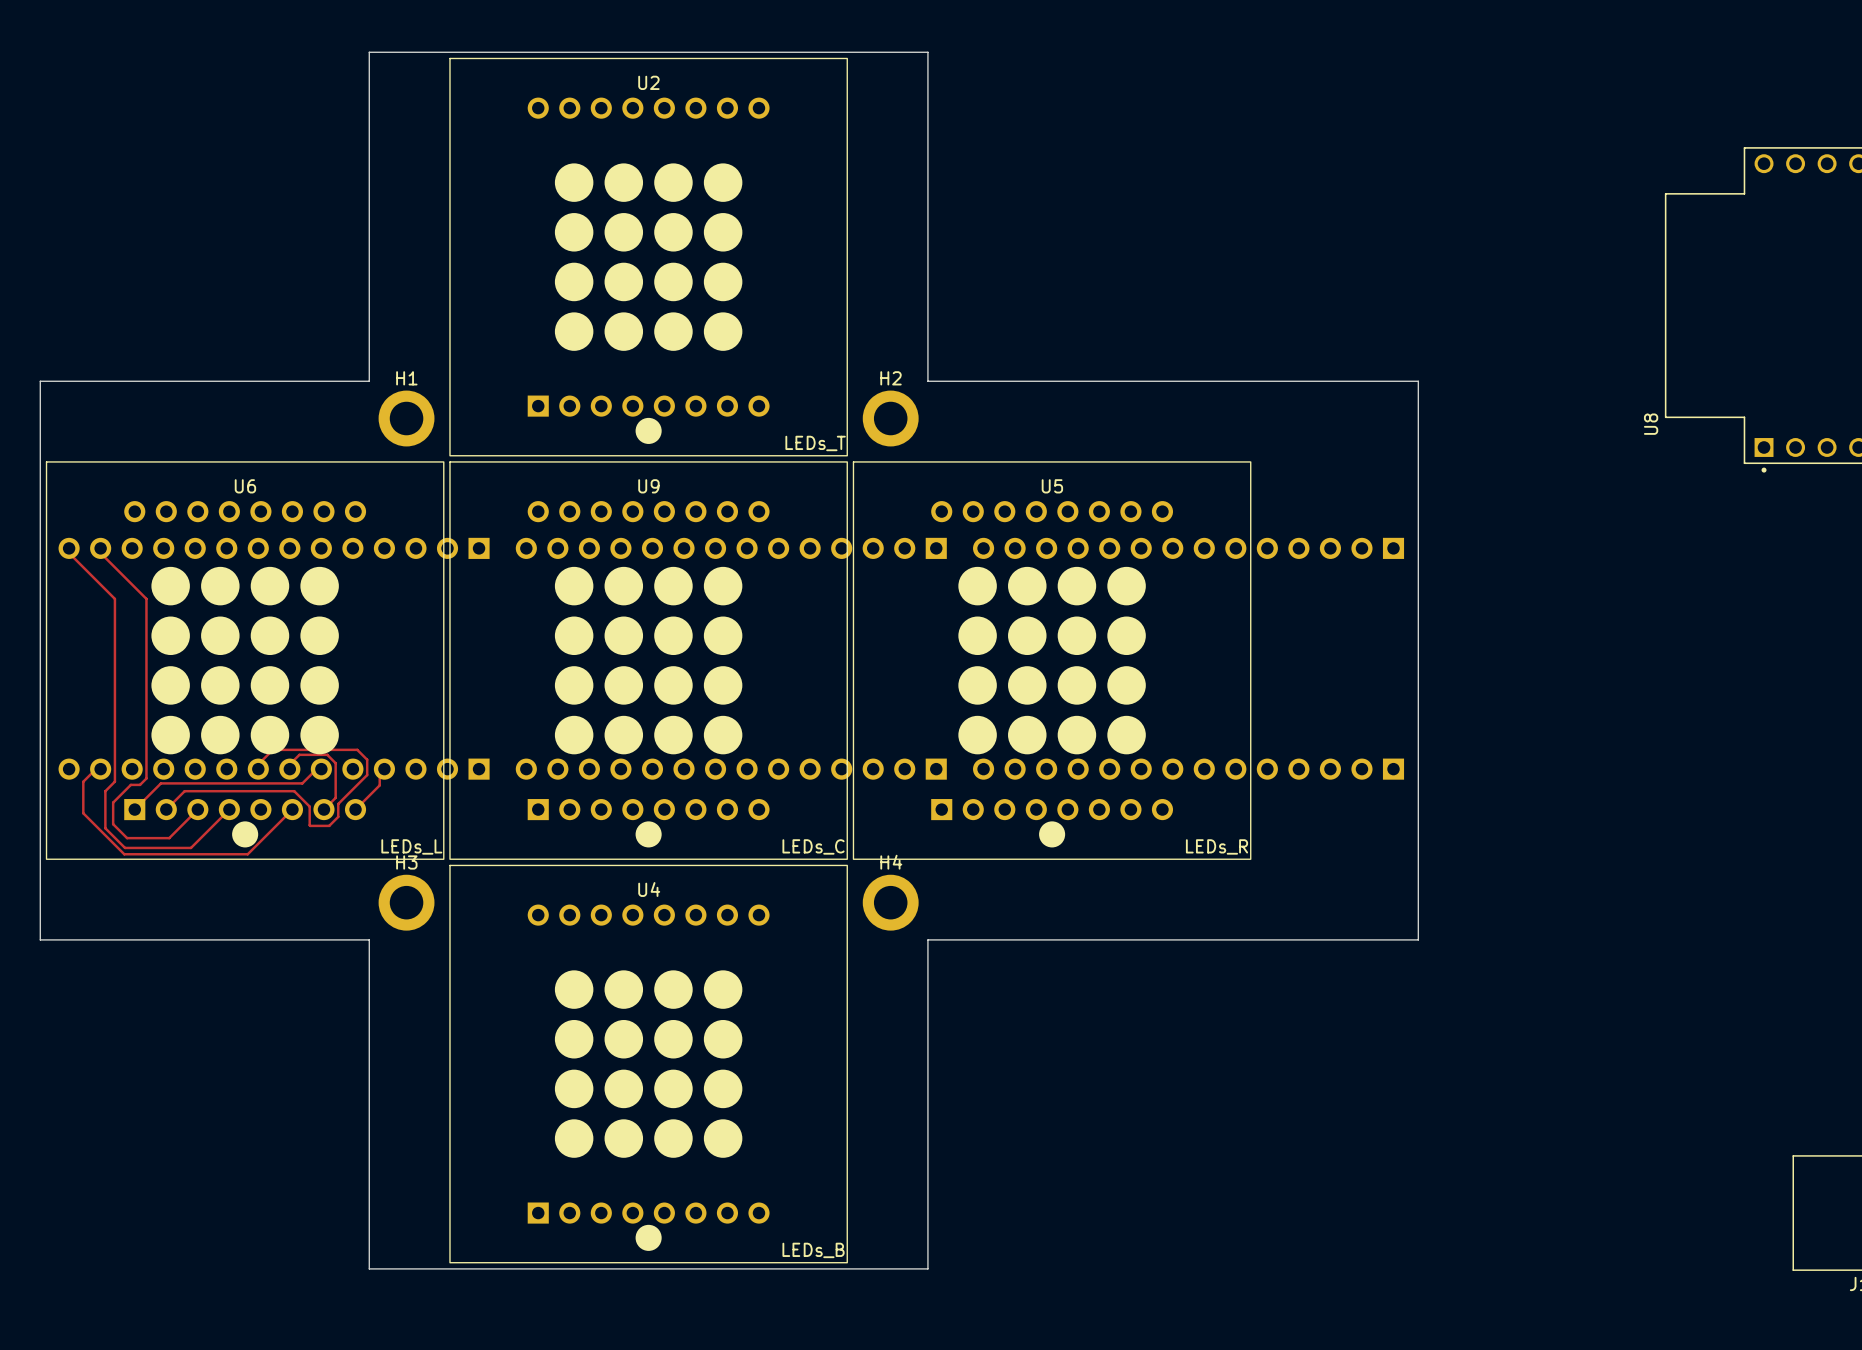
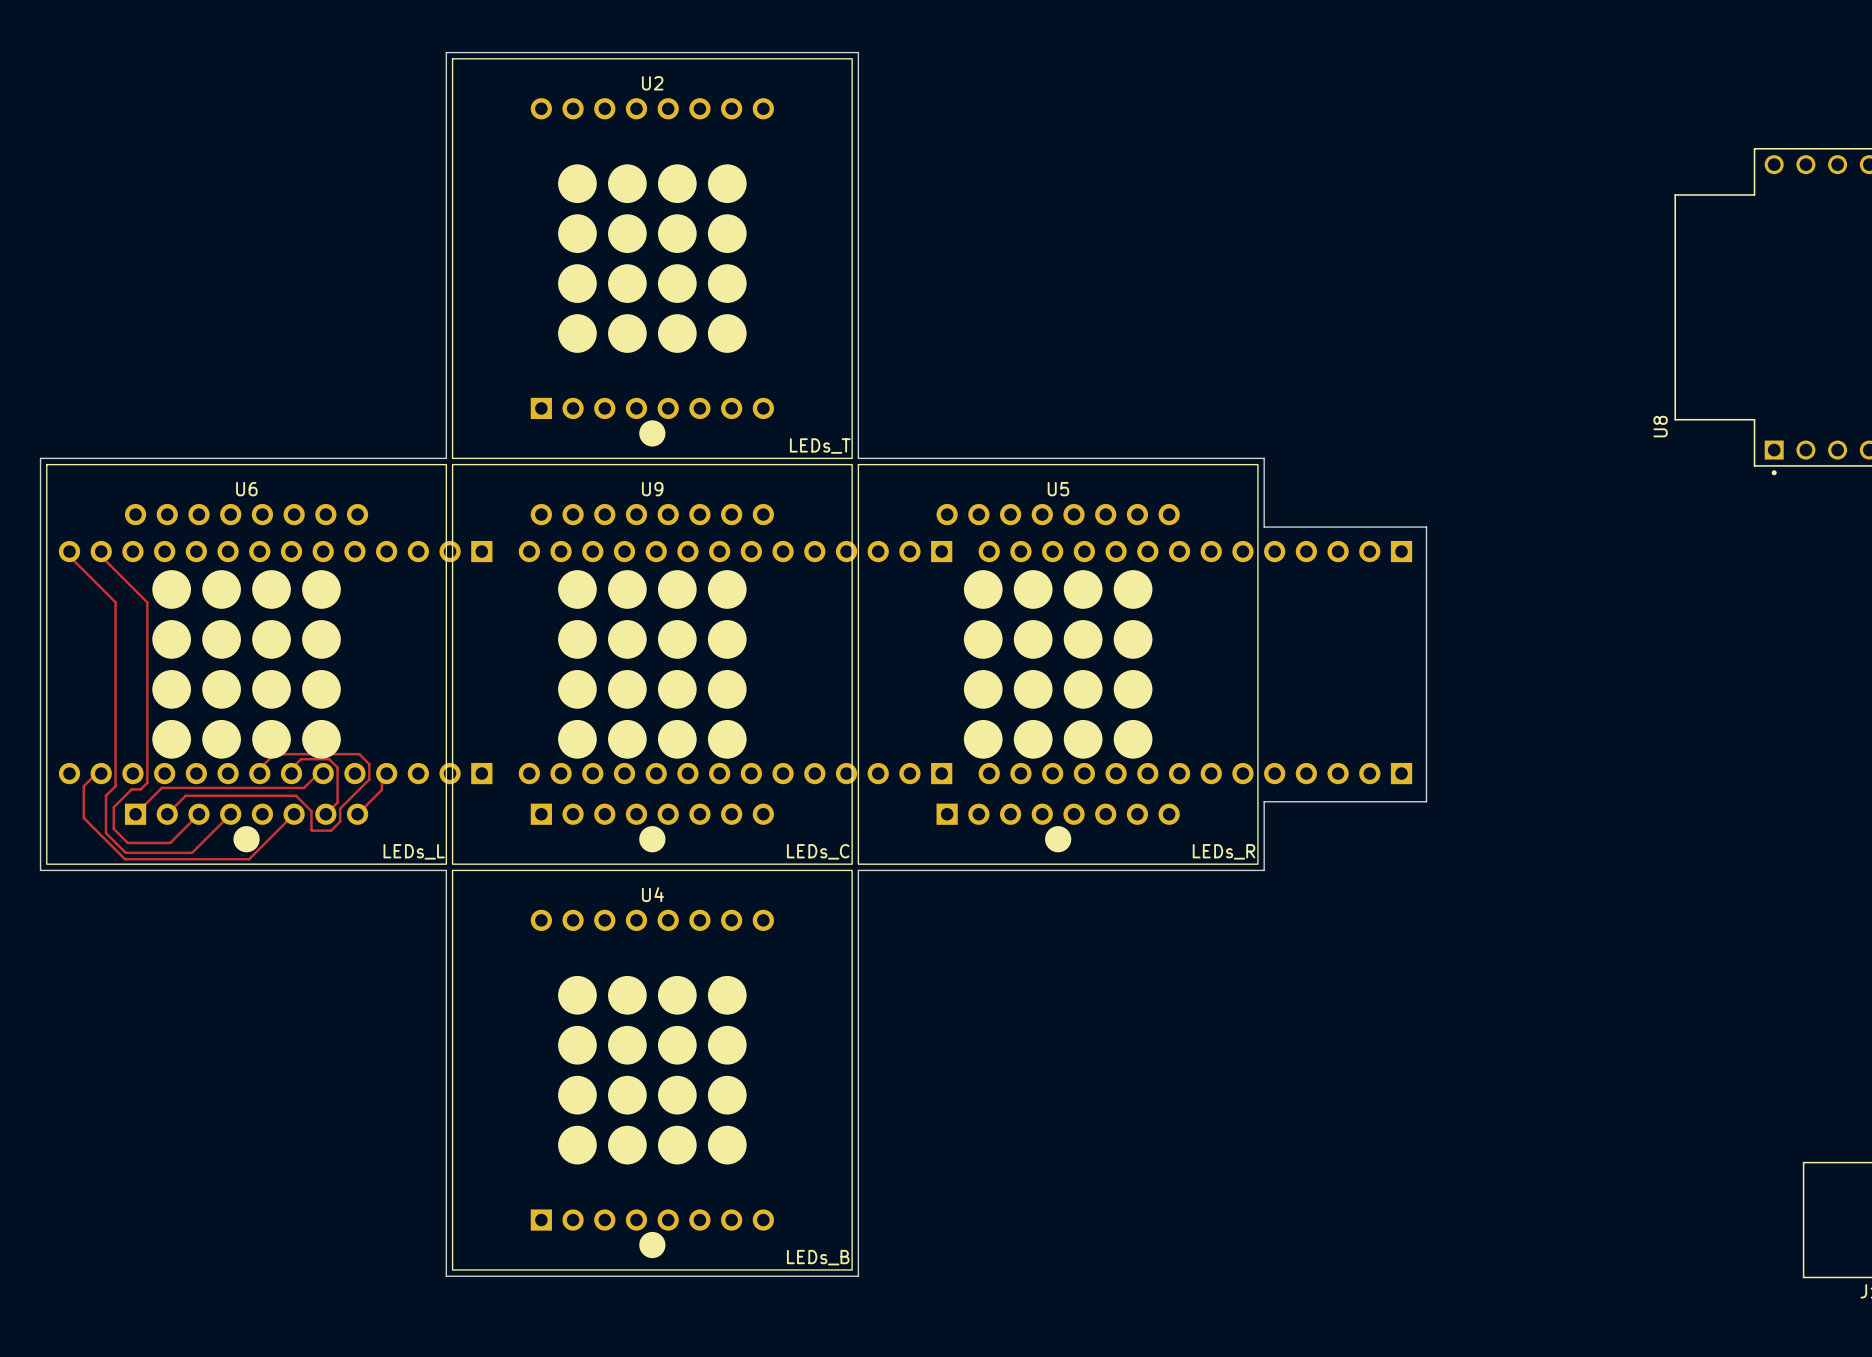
board edge: (443, 52) (369, 52) (369, 381) (40, 381) (40, 455) -> (446, 52) (446, 458) (40, 458)
board edge: (853, 52) (927, 52) (927, 381) (1418, 381) (1418, 524) -> (858, 52) (858, 458) (1264, 458) (1264, 527) (1426, 527)
H1: (406, 418) -> none
H2: (890, 418) -> none
board edge: (1418, 797) (1418, 939) (927, 939) (927, 1268) (853, 1268) -> (1426, 801) (1264, 801) (1264, 870) (858, 870) (858, 1276)
board edge: (40, 865) (40, 939) (369, 939) (369, 1268) (443, 1268) -> (40, 870) (446, 870) (446, 1276)
H3: (406, 902) -> none
H4: (890, 902) -> none

